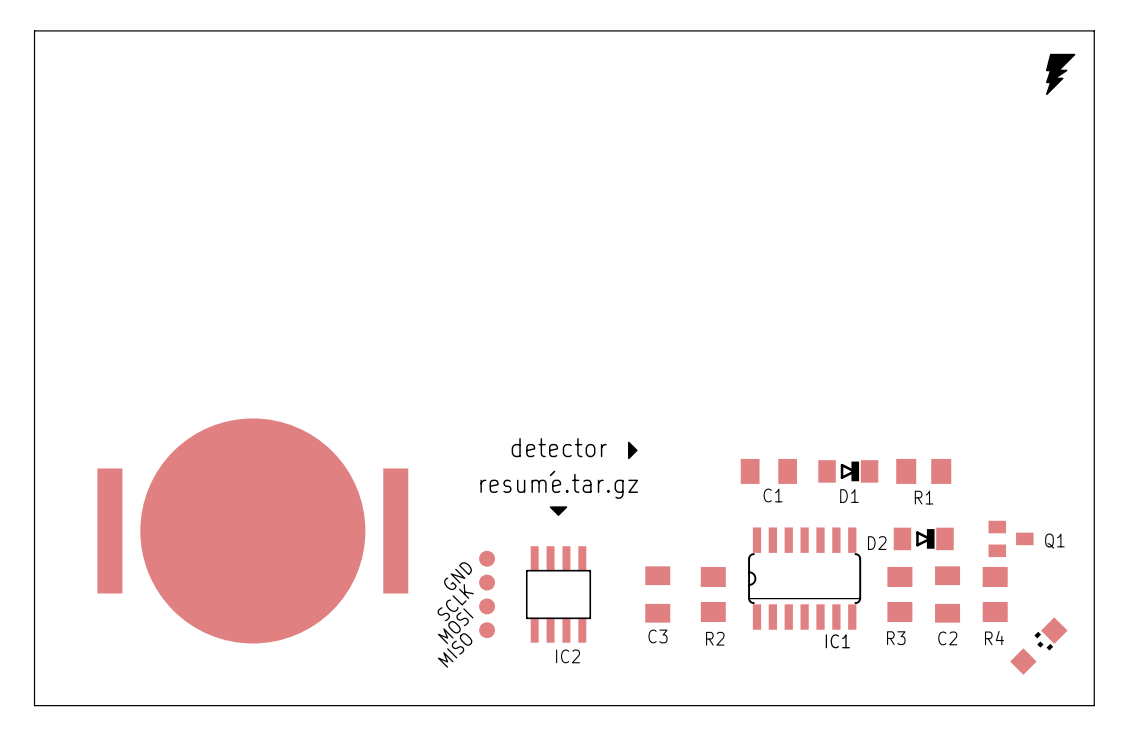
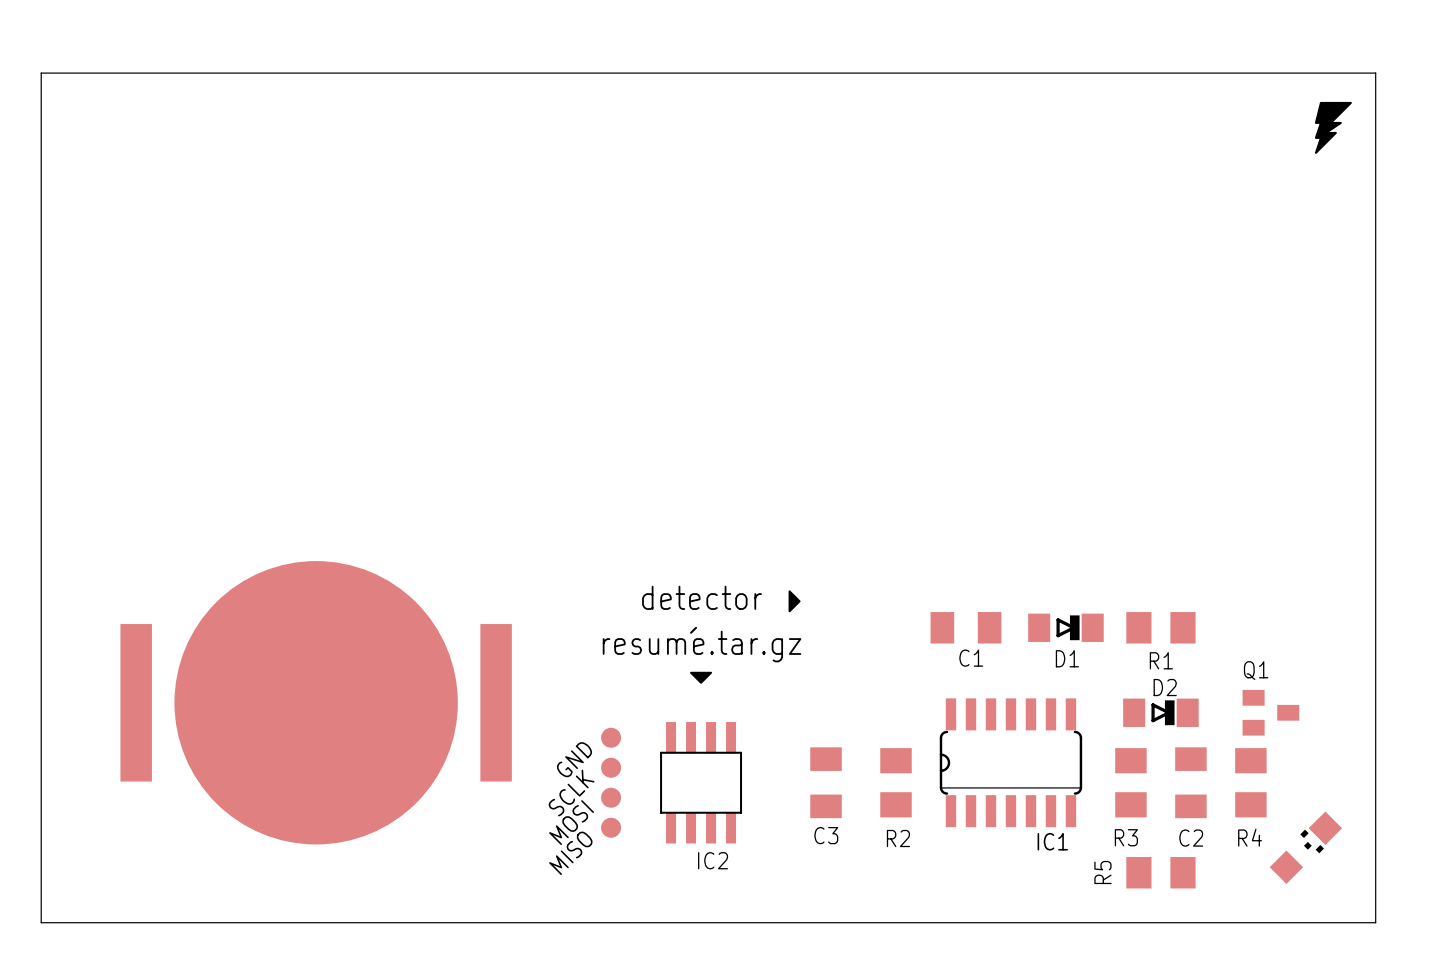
Q1 name position: Q1 (1054, 541) -> Q1 (1256, 670)
D2 name position: D2 (877, 543) -> D2 (1165, 687)
R5: none -> (1160, 872)

